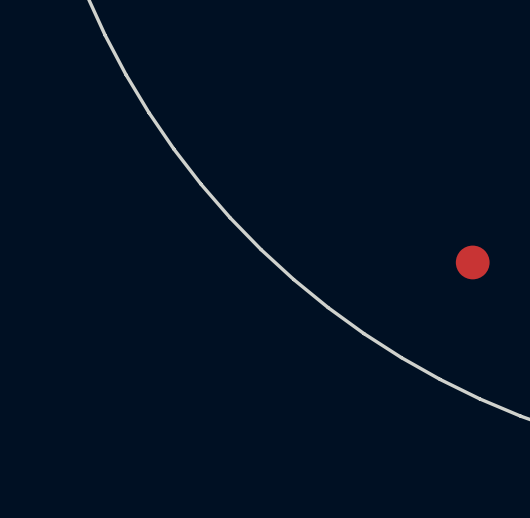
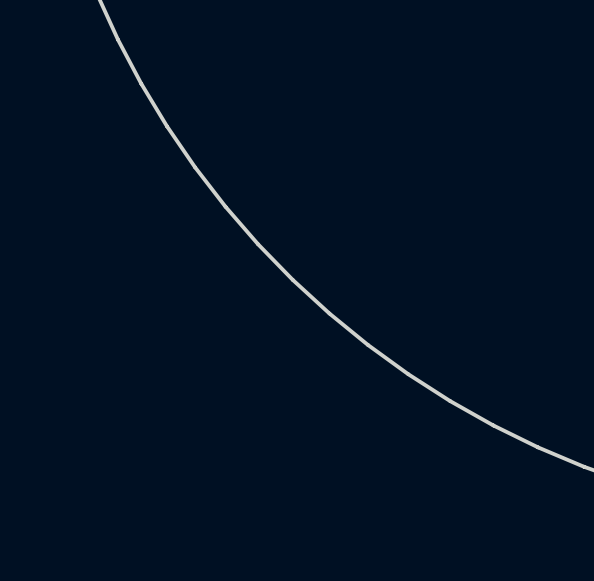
part: (472, 262) -> none

